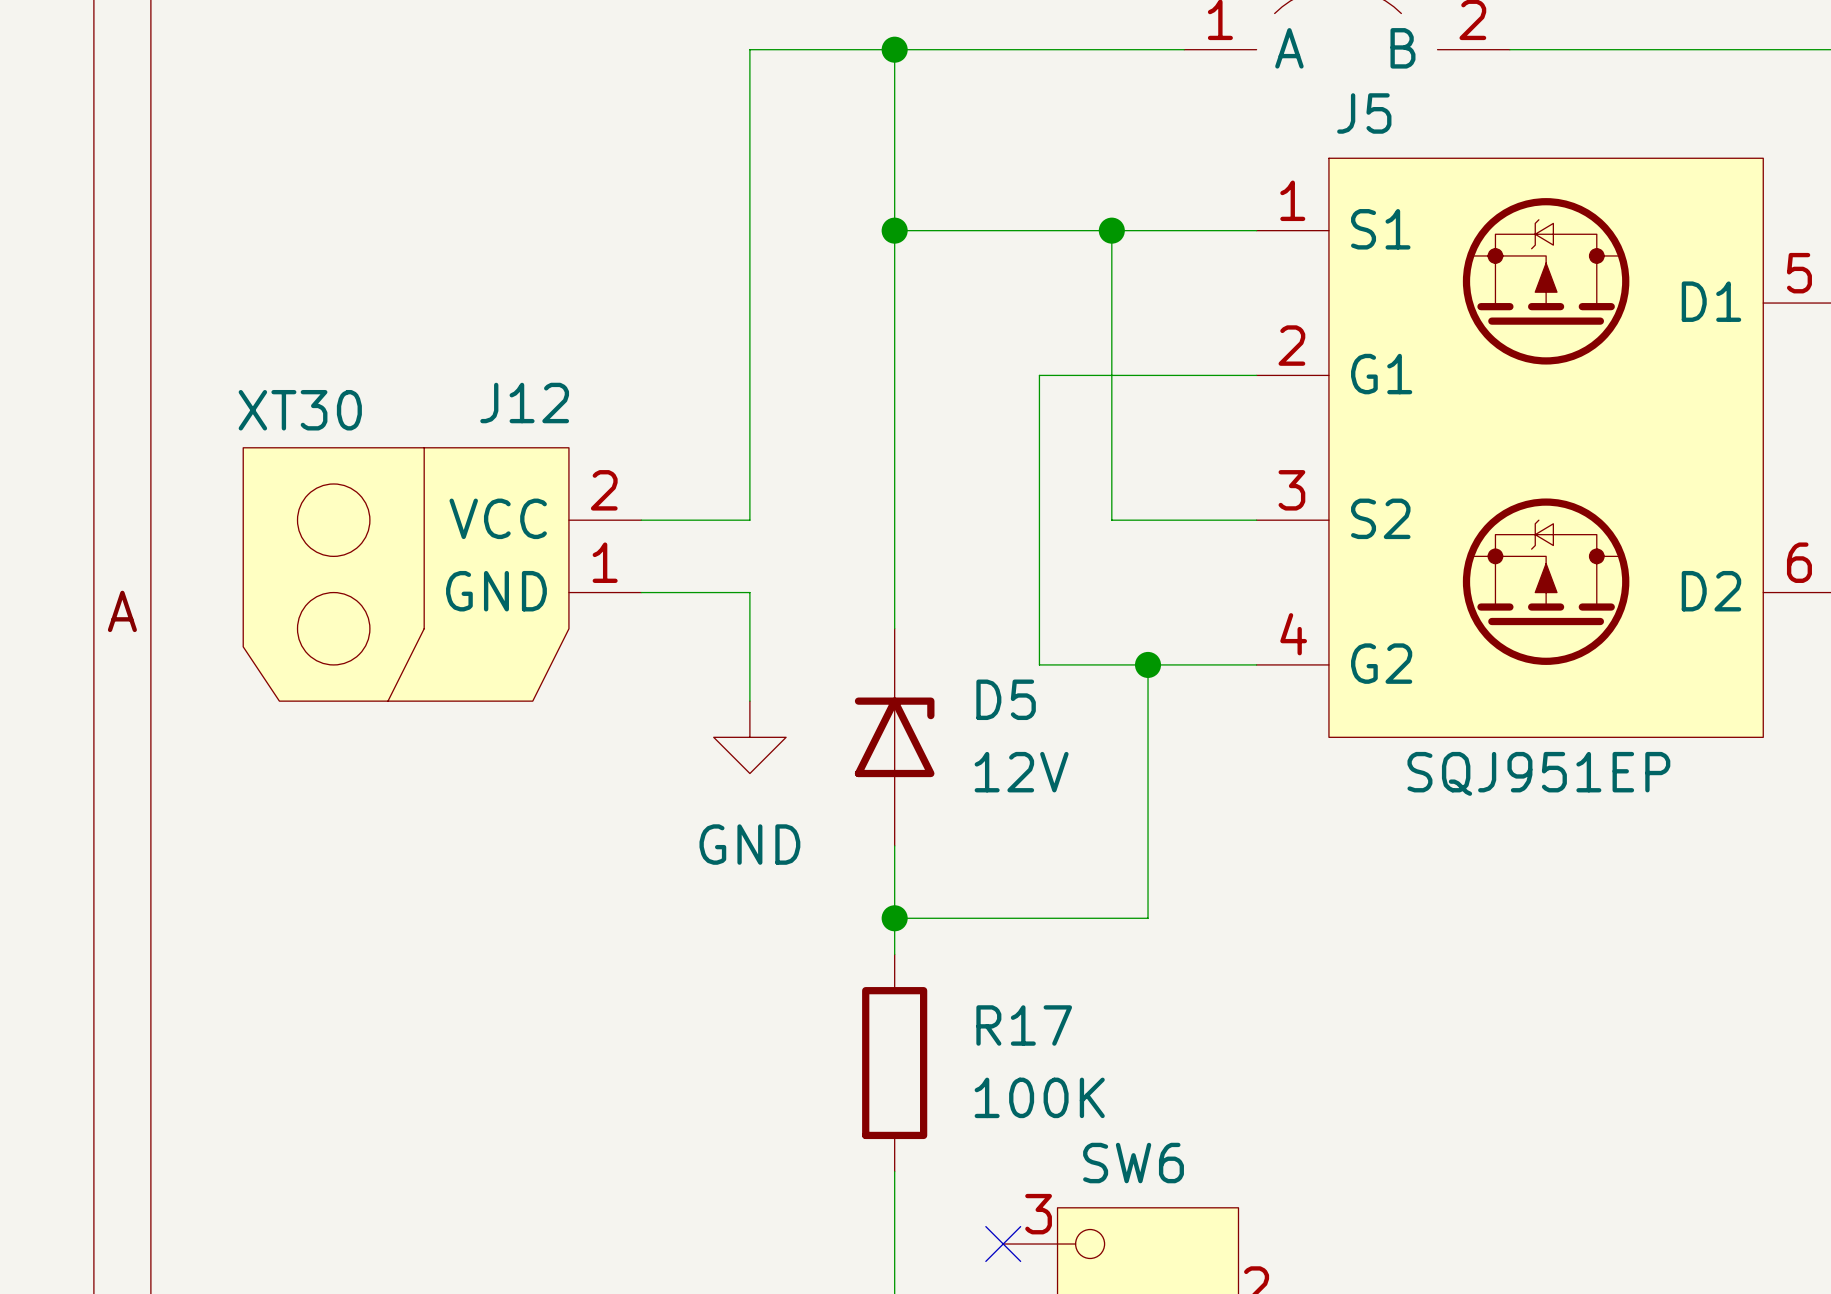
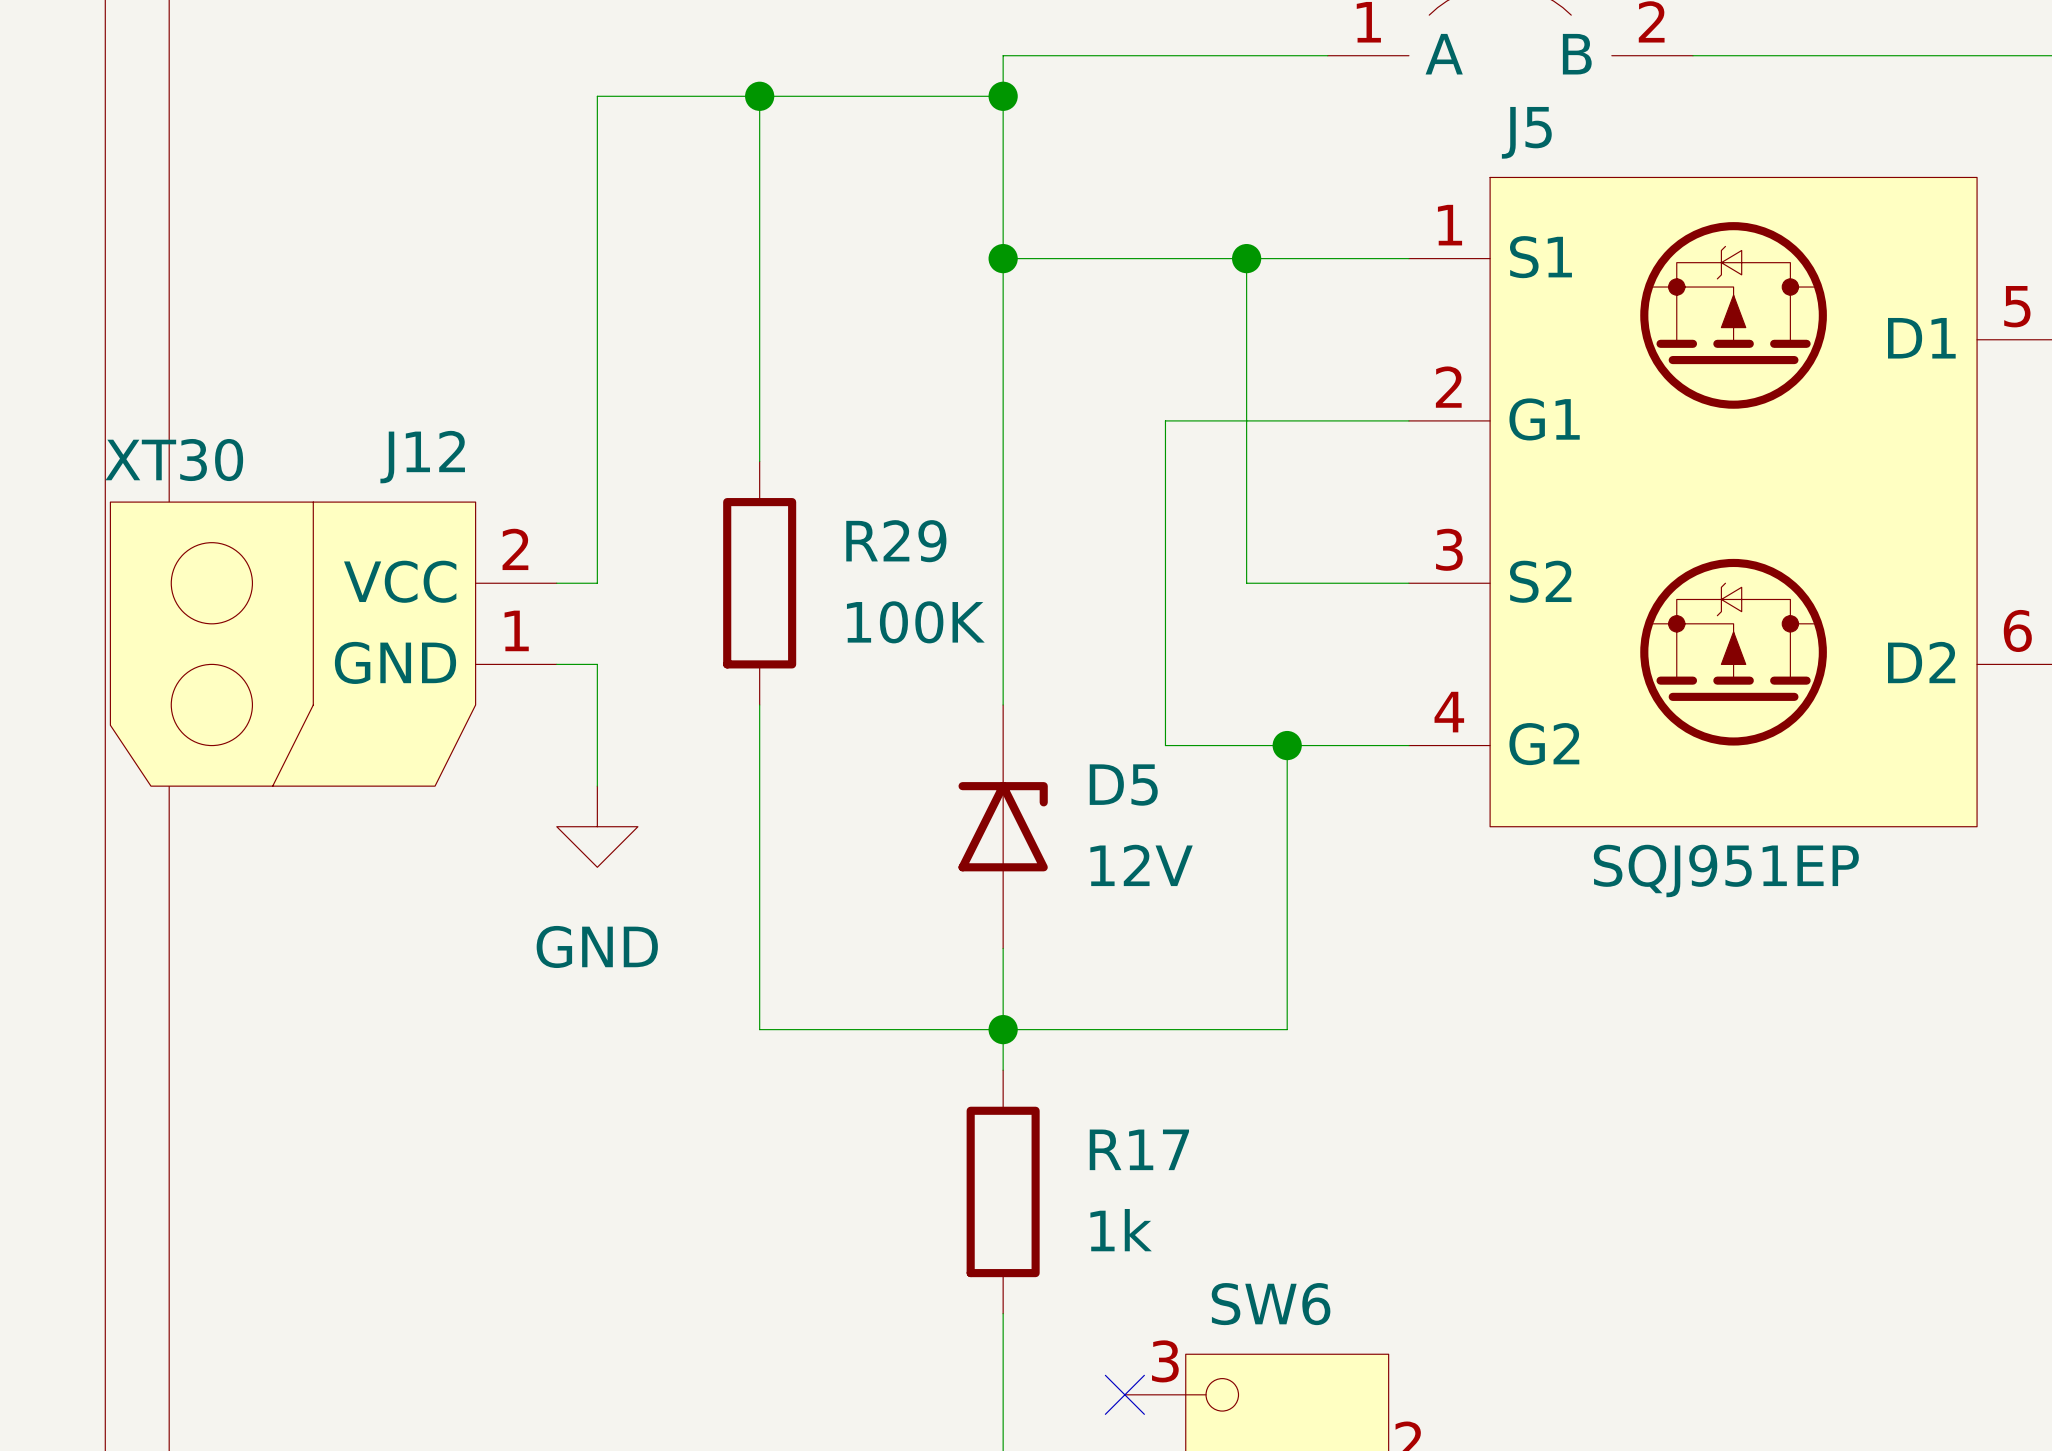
wire: (894, 49) (749, 49) (749, 520) (641, 520) -> none
junction position: (894, 49) -> (1003, 96)
wire: none -> (759, 96) (759, 461)
junction: none -> (759, 96)
wire: none -> (1003, 96) (597, 96) (597, 583) (556, 583)
R29: none -> 100K (759, 583)
J12 position: (442, 574) -> (333, 644)
wire: (641, 592) (749, 592) (749, 701) -> none
wire: none -> (759, 704) (759, 1029) (1003, 1029)
power symbol position: GND (749, 737) -> GND (597, 826)
R17 value: 100K (1039, 1097) -> 1k (1121, 1230)

